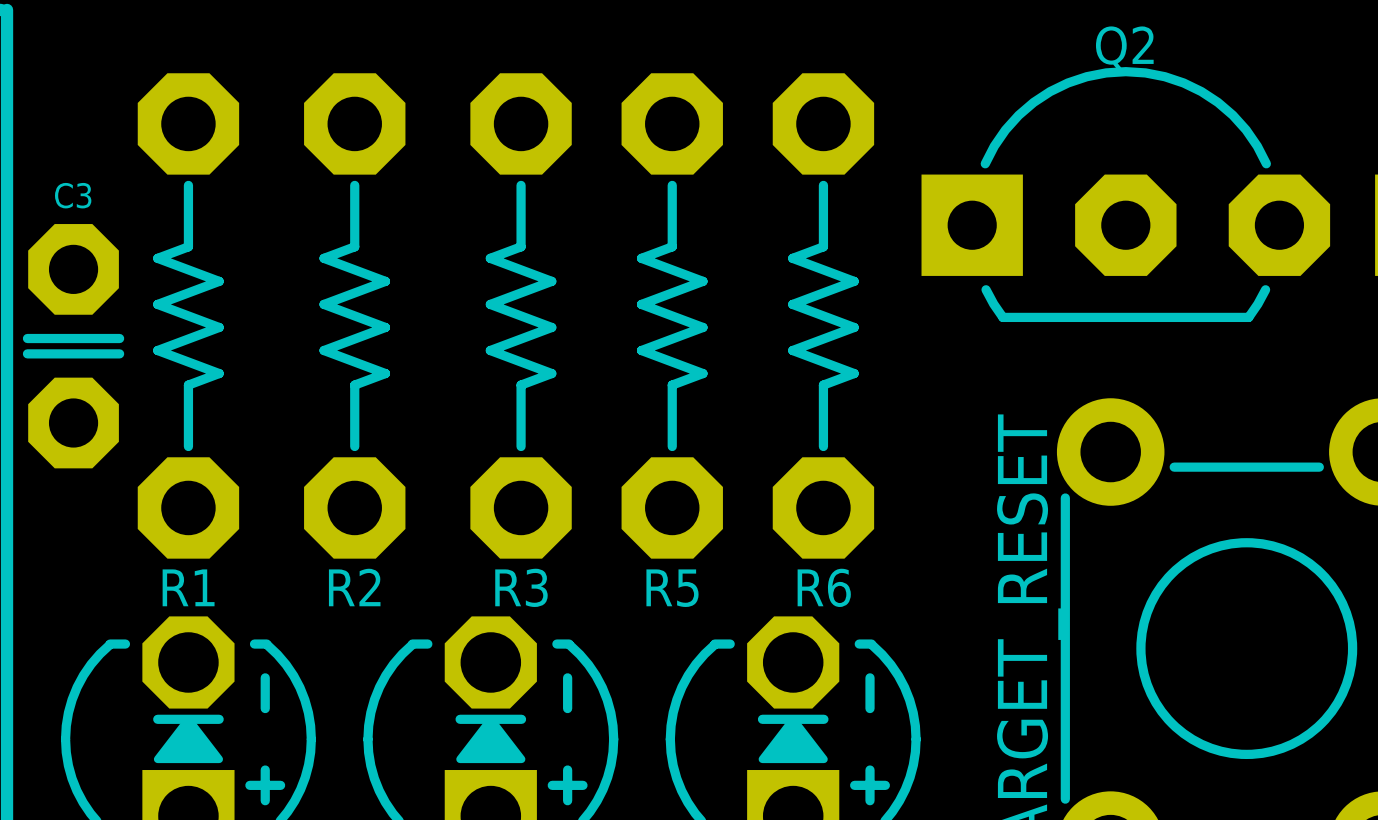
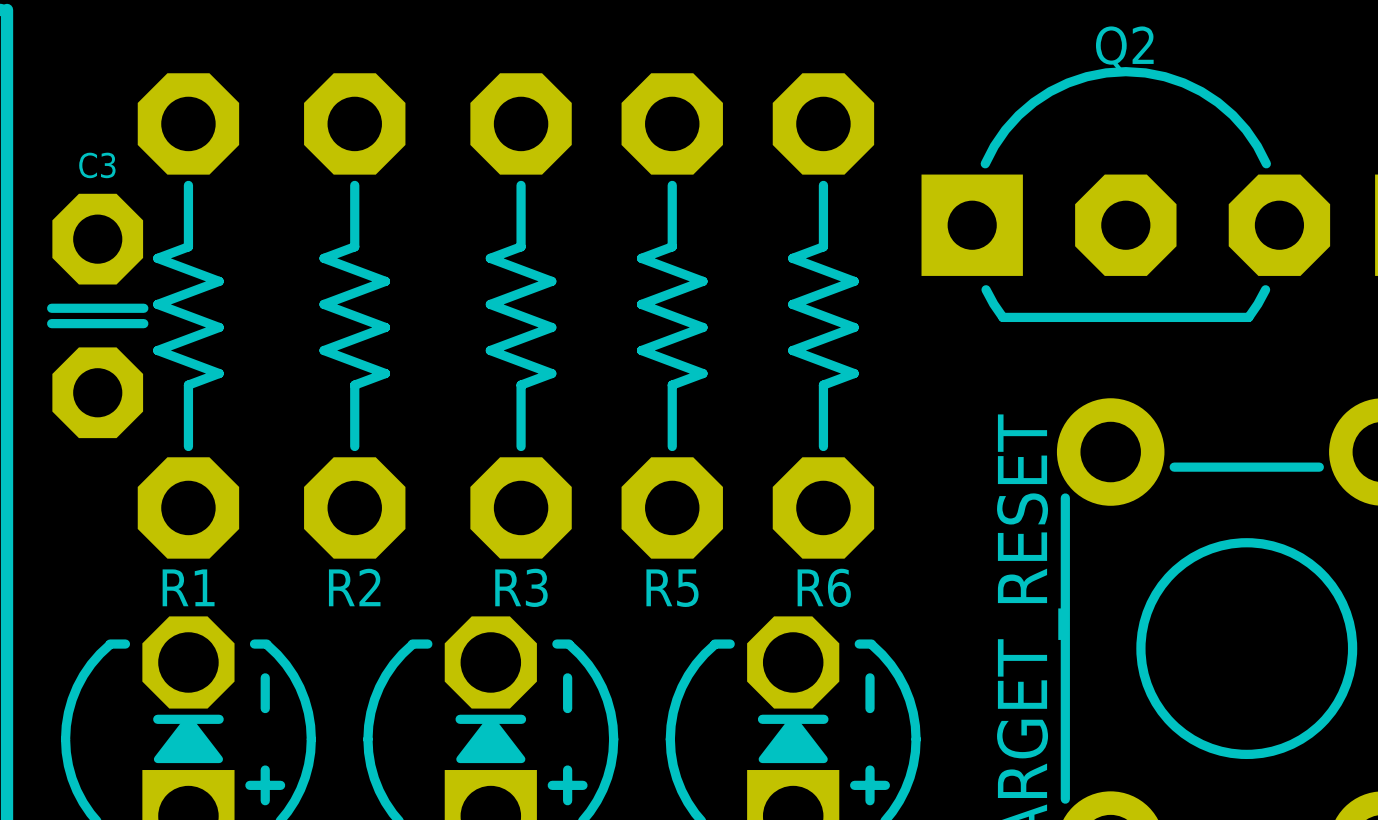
C3 position: (73, 346) -> (97, 315)

